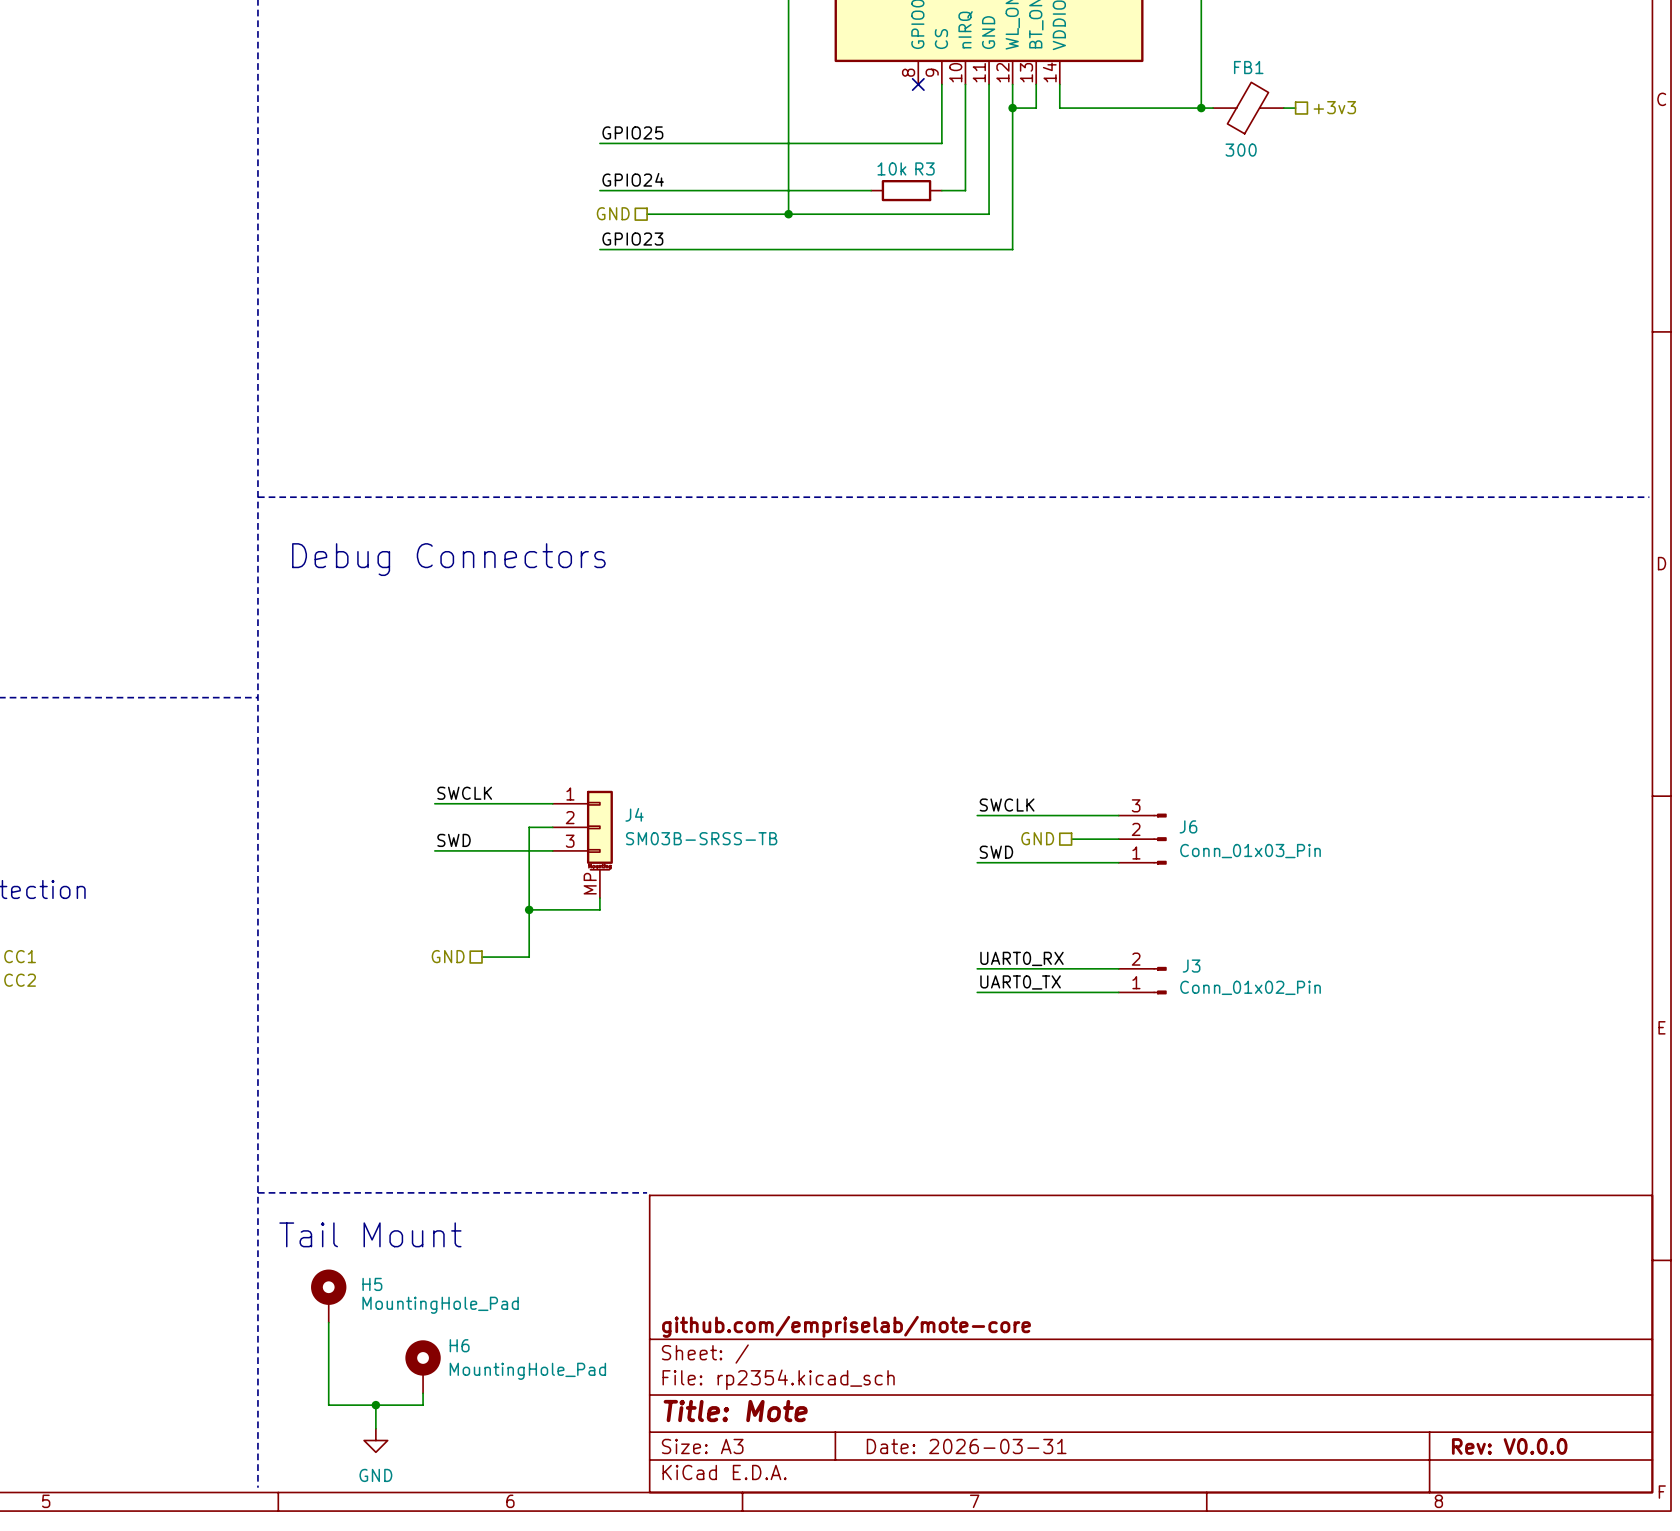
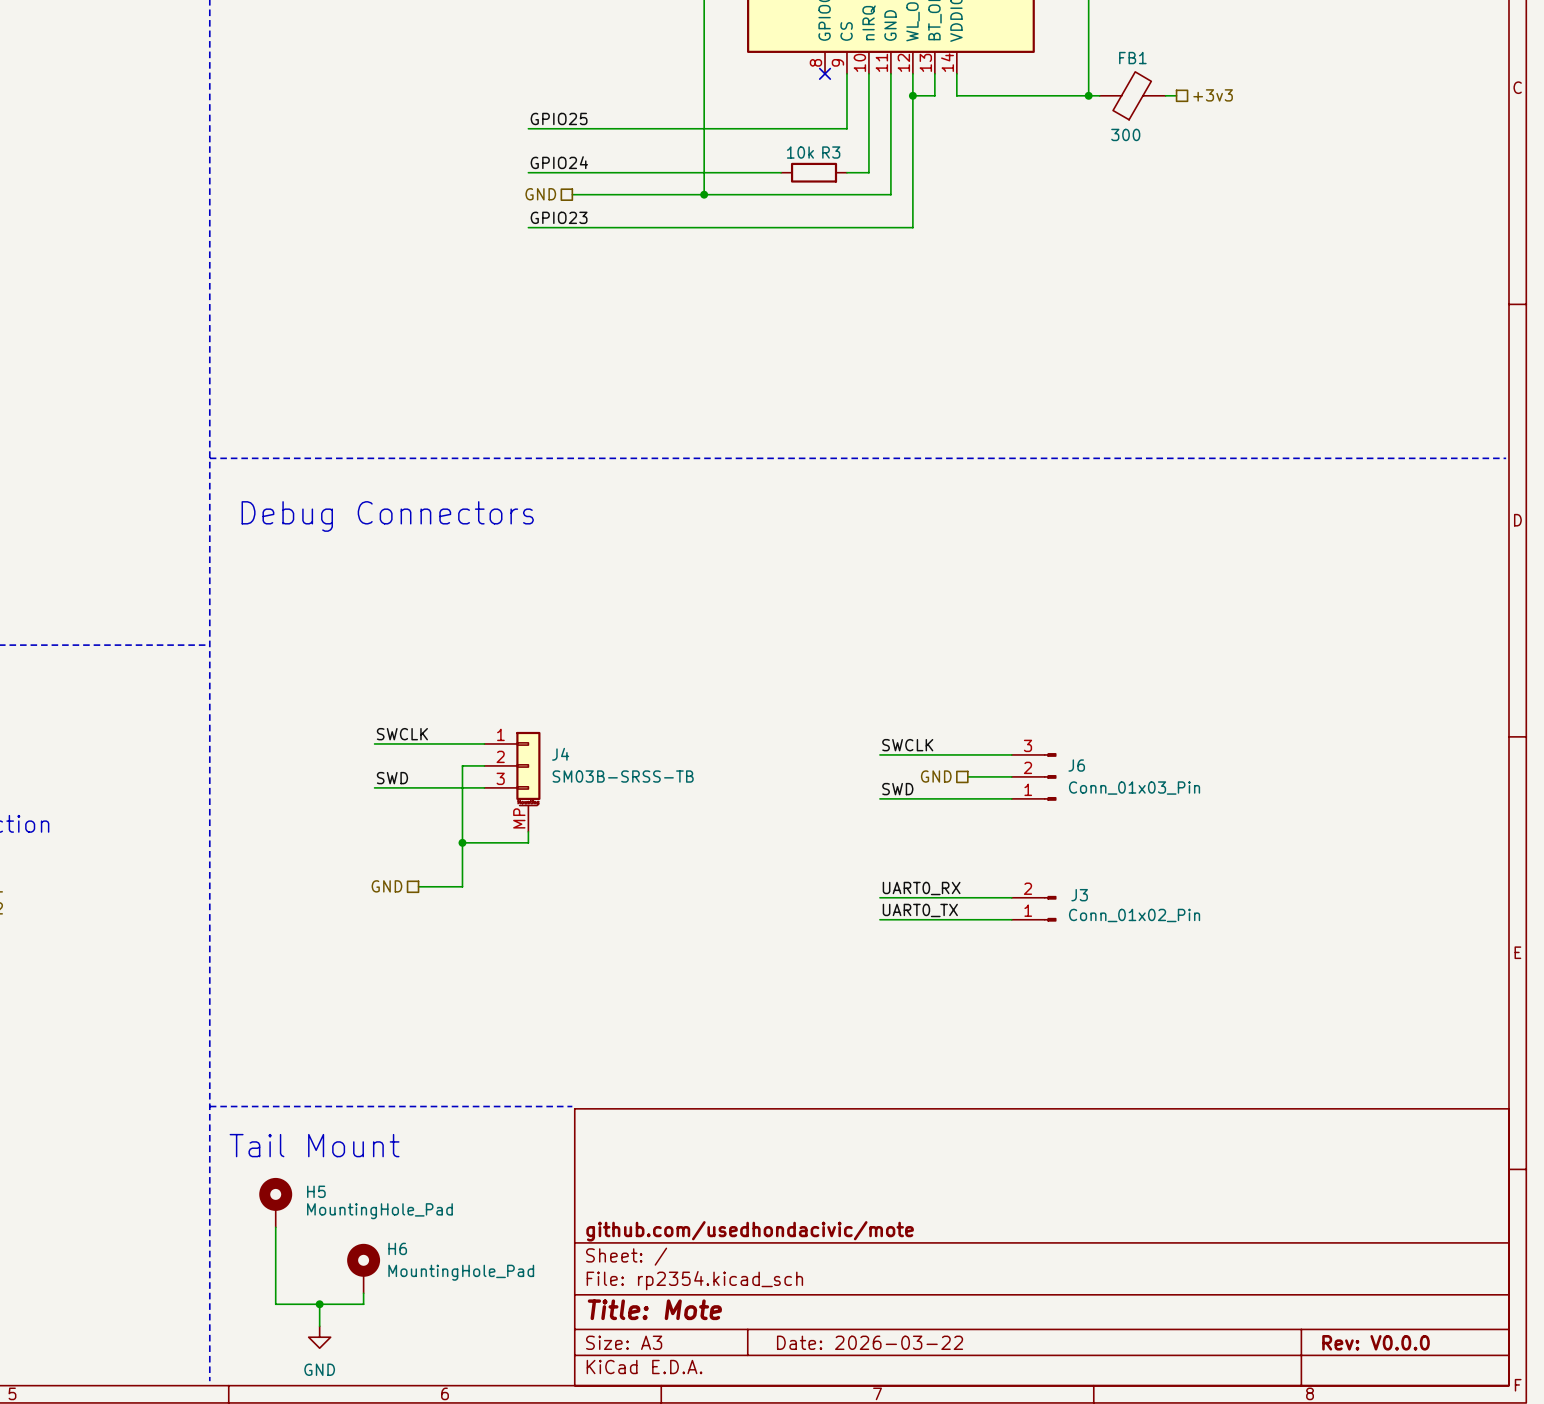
title block: github.com/empriselab/mote-core (846, 1326) -> github.com/usedhondacivic/mote (750, 1231)
title block: Date: 2026-03-31 (966, 1446) -> Date: 2026-03-22 (870, 1342)

